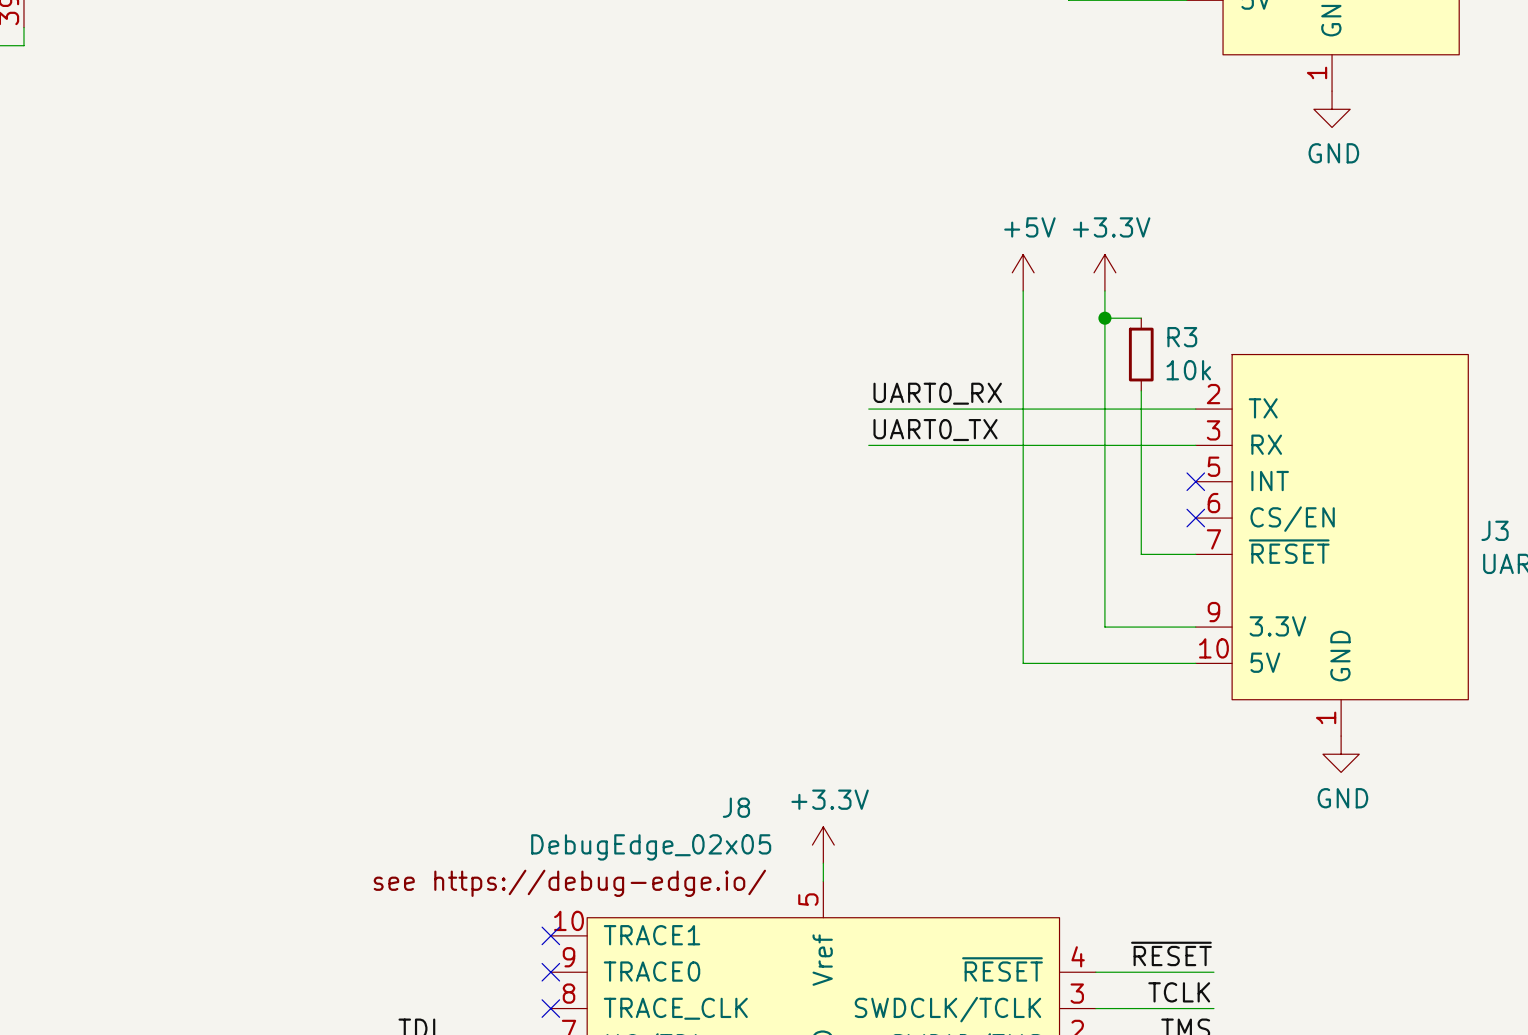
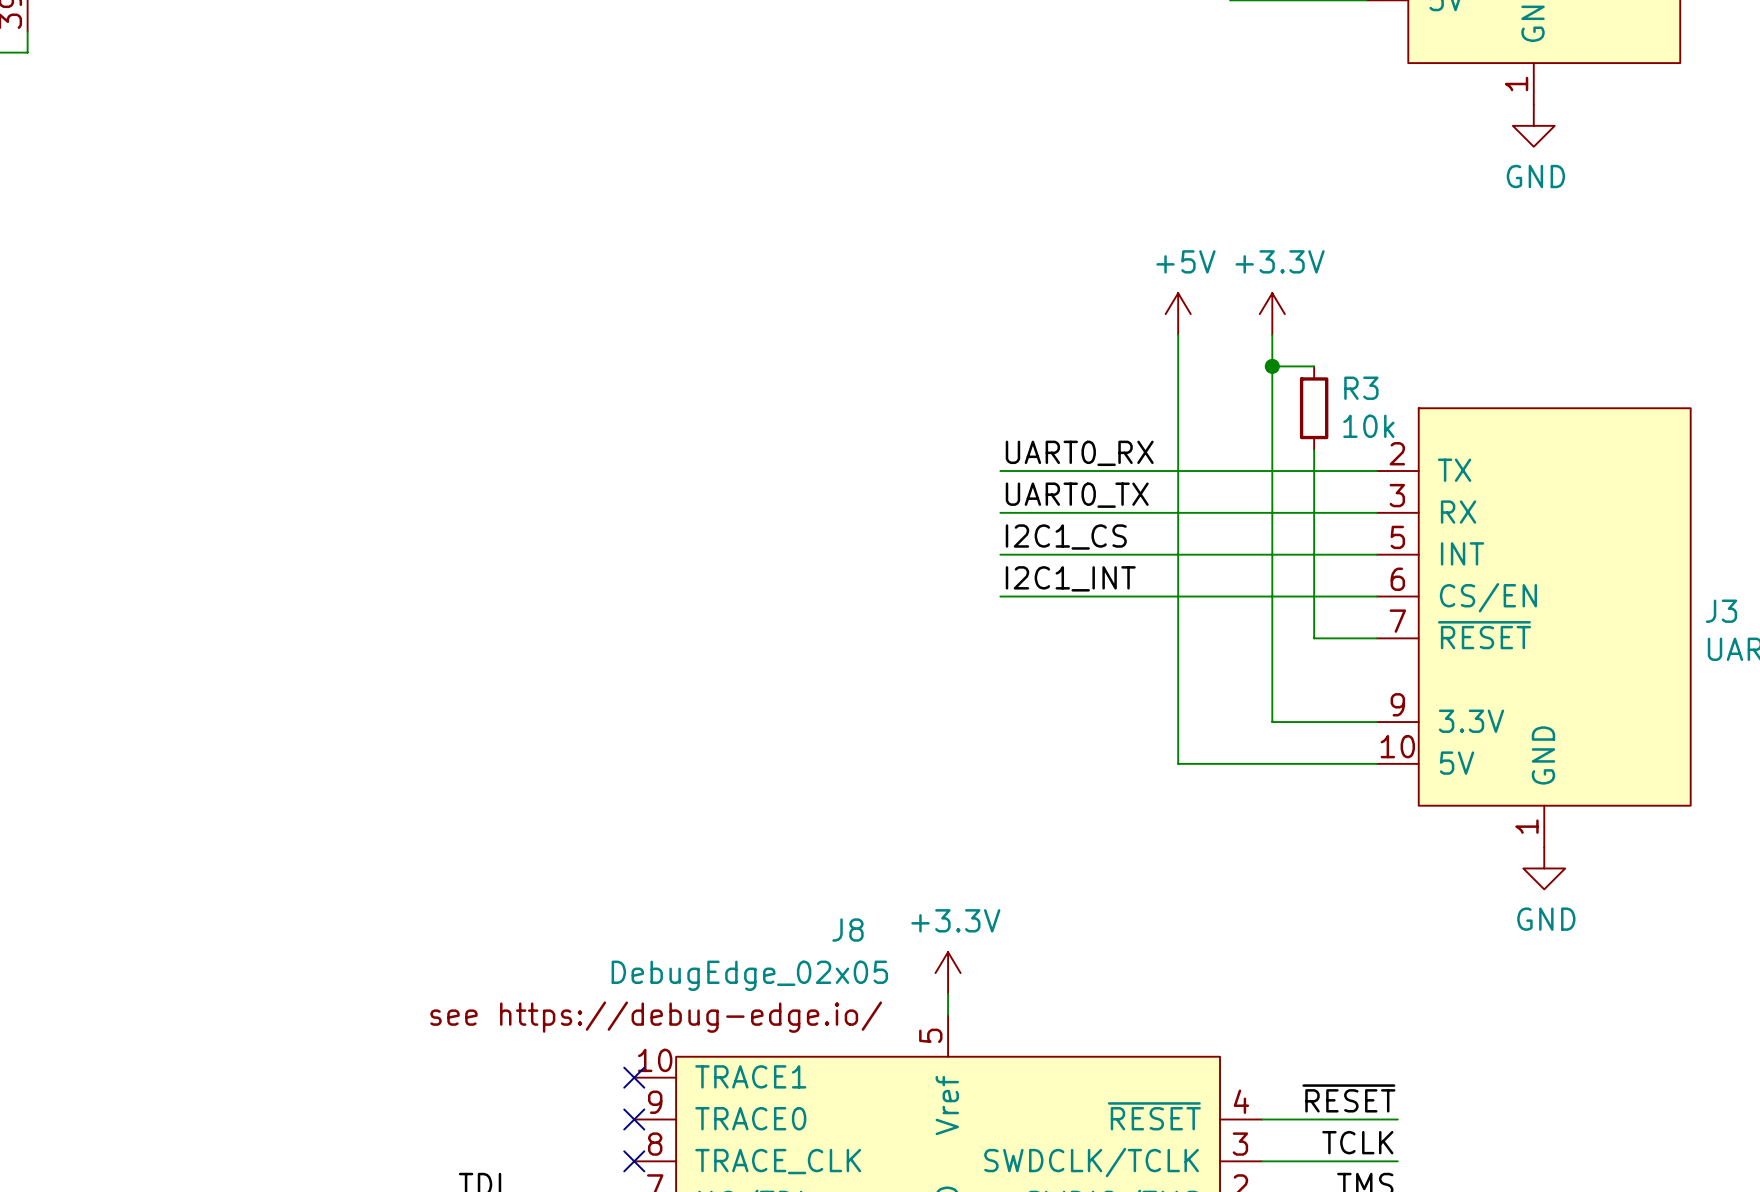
label: none -> I2C1_CS (1066, 537)
wire: none -> (1000, 554) (1376, 554)
no-connect mark: (1195, 481) -> none
label: none -> I2C1_INT (1070, 578)
wire: none -> (1000, 596) (1376, 596)
no-connect mark: (1195, 518) -> none

